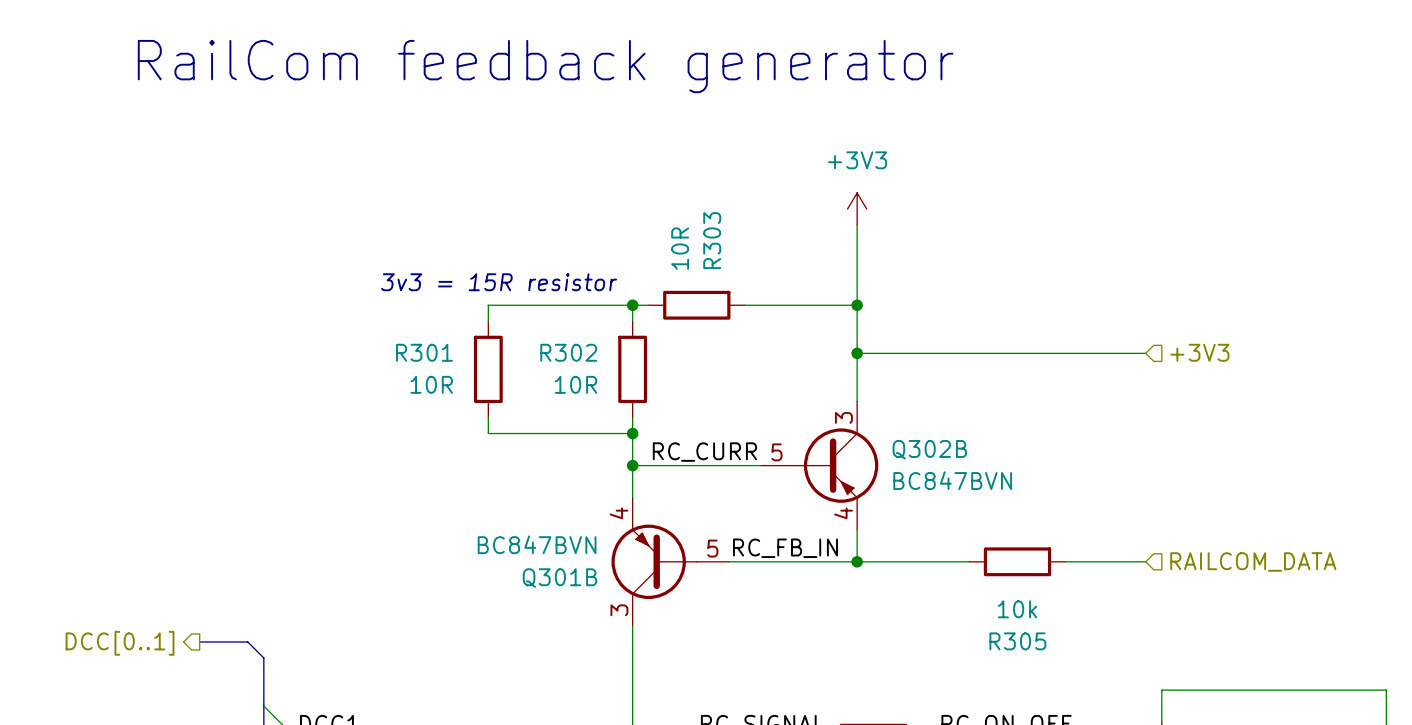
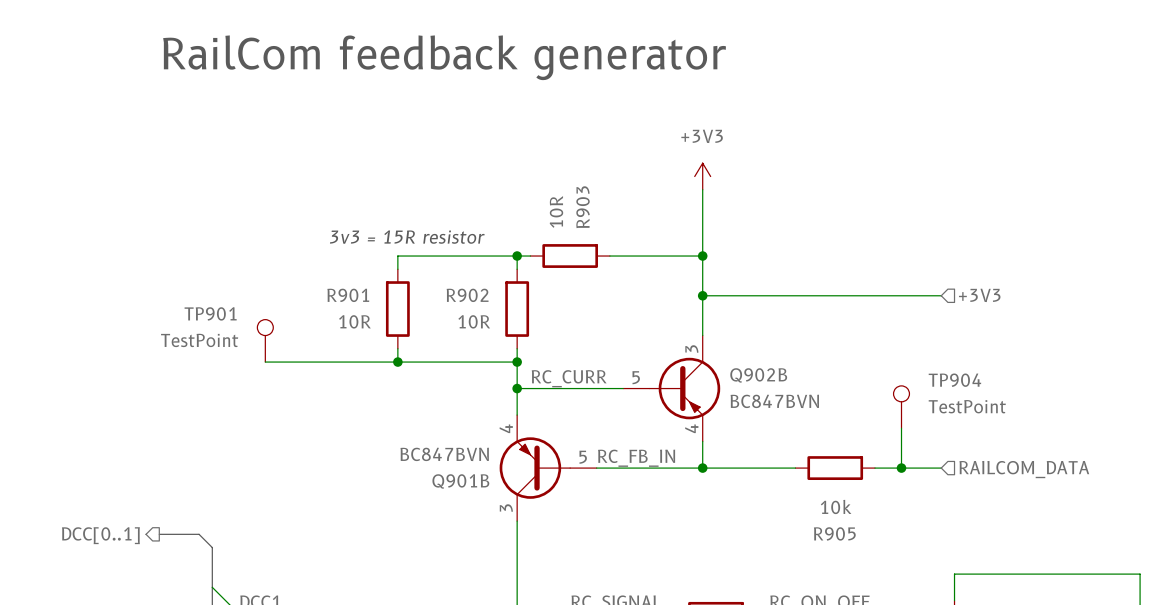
R303 name: R303 (712, 240) -> R903 (583, 207)
R301 name: R301 (424, 352) -> R901 (348, 295)
R302 name: R302 (568, 352) -> R902 (467, 295)
TP901: none -> TestPoint (265, 340)
wire: none -> (265, 362) (397, 362)
junction: none -> (397, 362)
Q302B name: Q302B (929, 449) -> Q902B (758, 375)
TP904: none -> TestPoint (901, 407)
wire: none -> (901, 428) (901, 468)
junction: none -> (901, 468)
Q301B name: Q301B (559, 578) -> Q901B (460, 481)
R305 name: R305 (1017, 641) -> R905 (834, 533)

